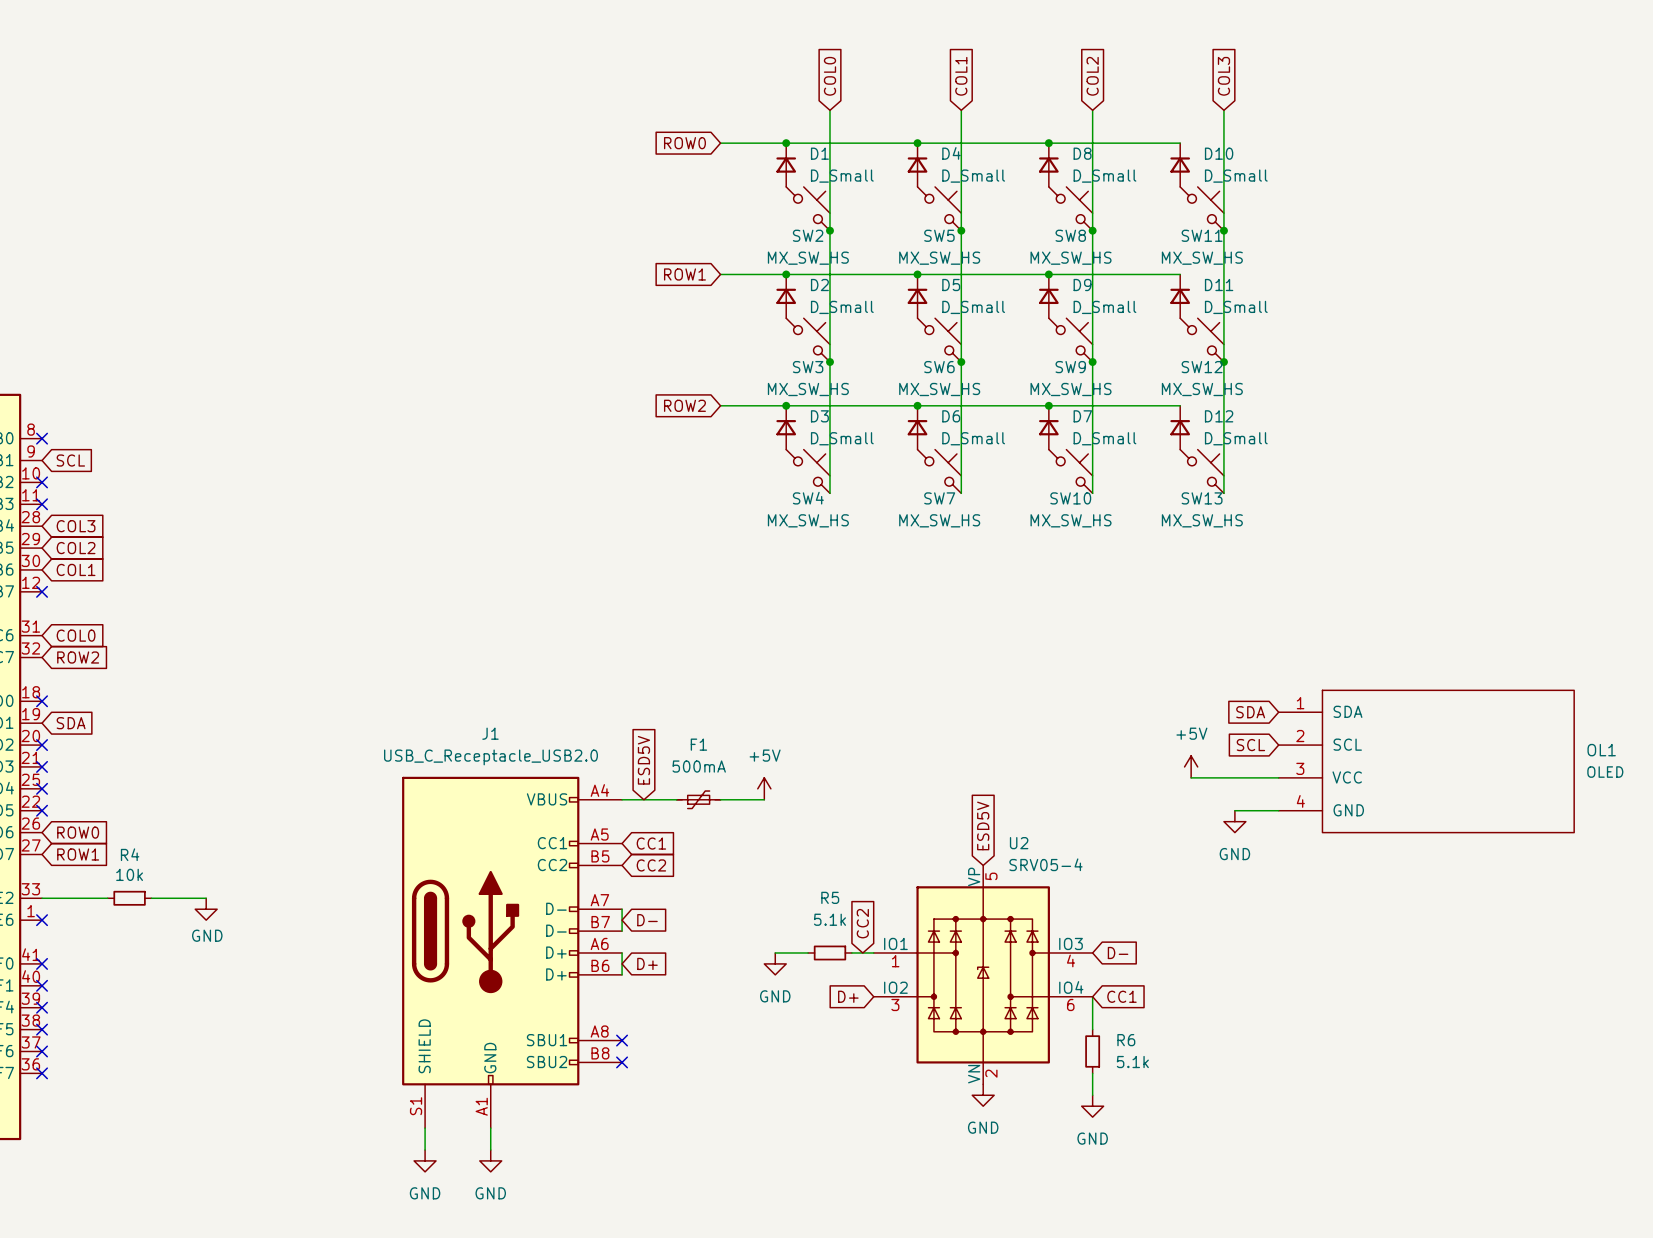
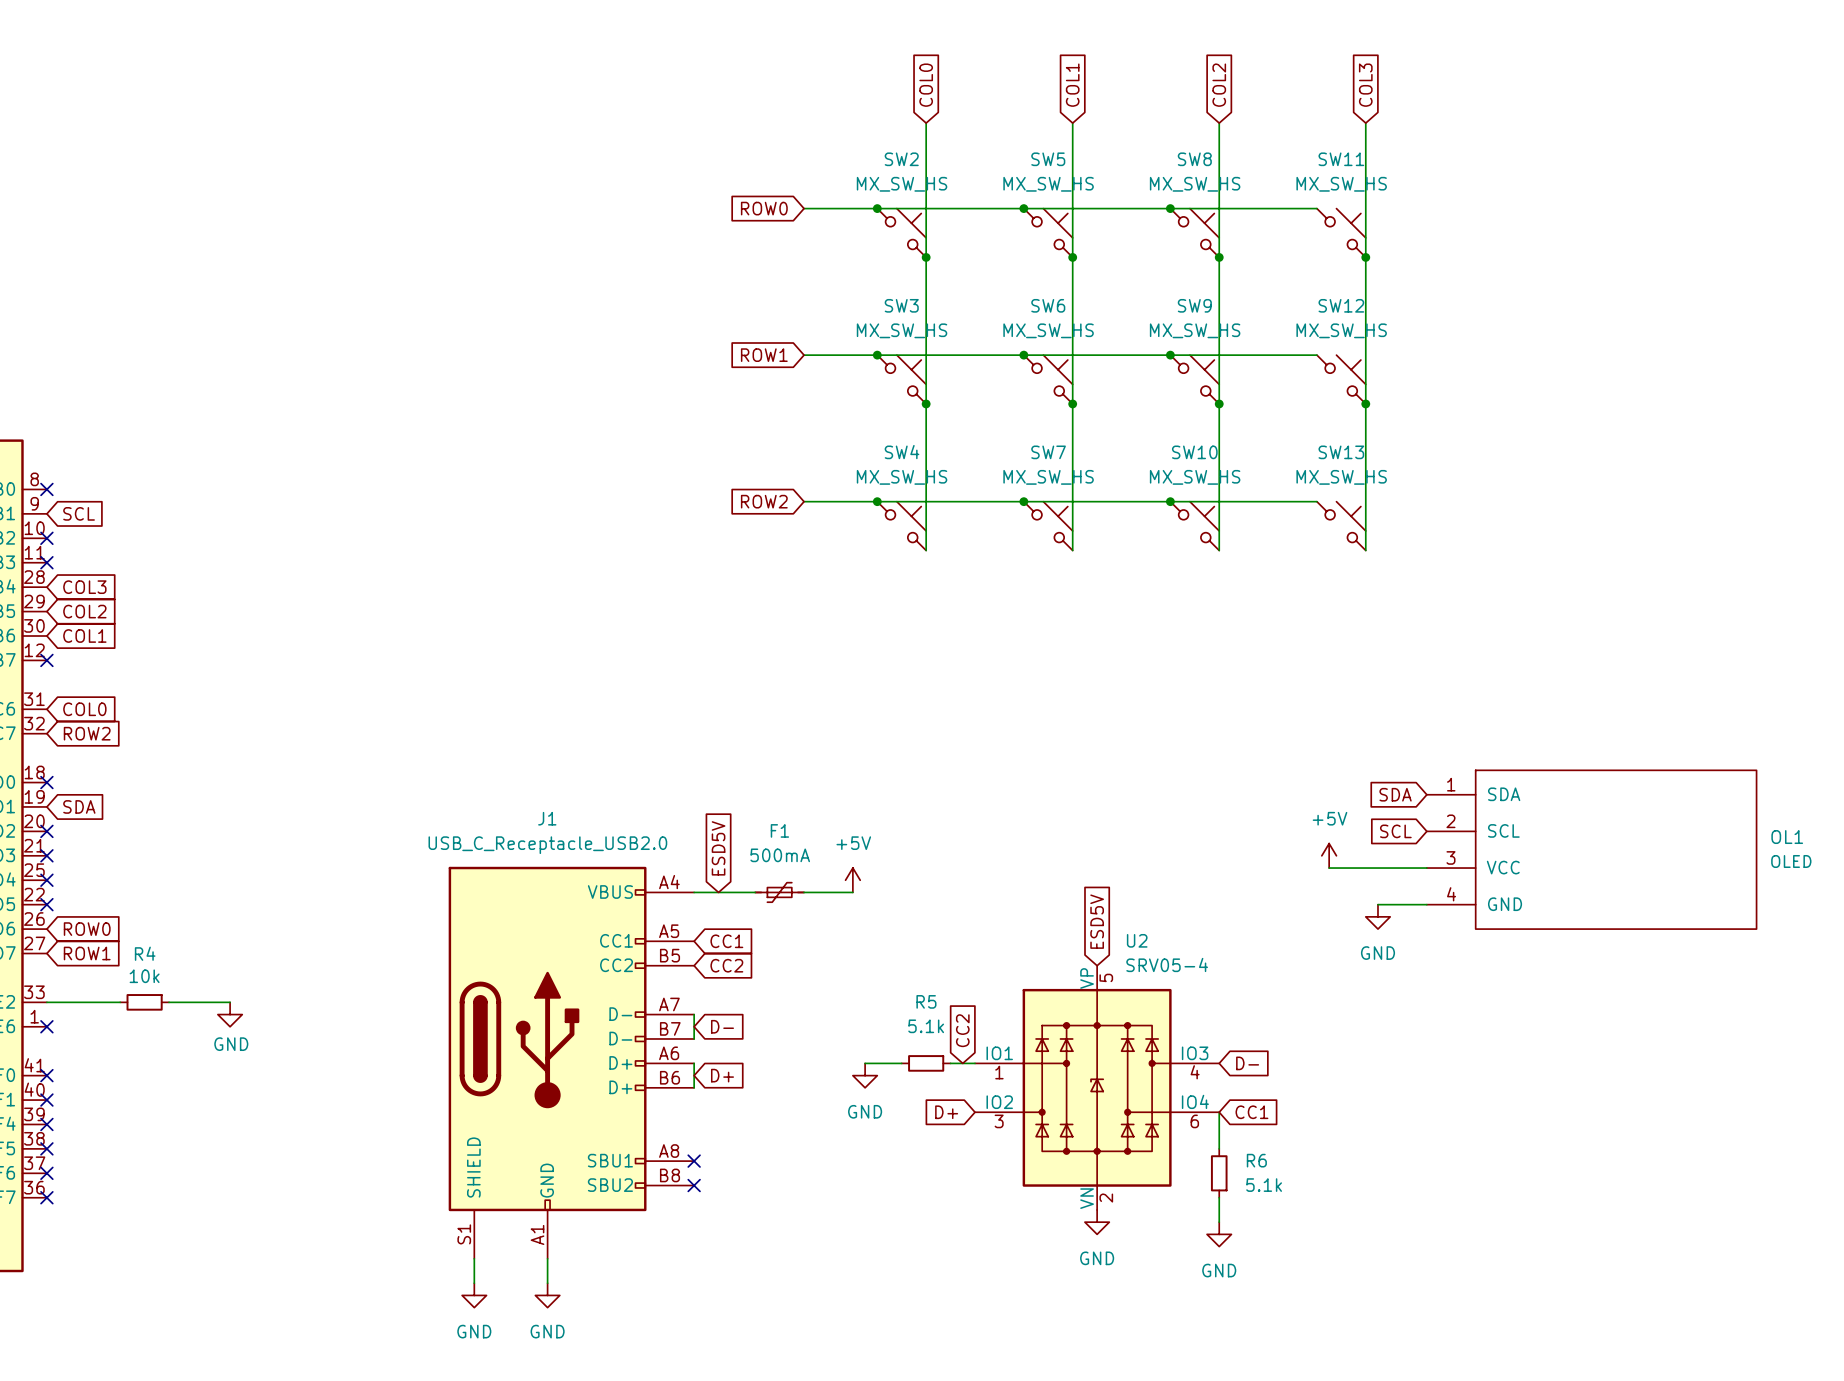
global label position: ROW0 (684, 143) -> ROW0 (764, 208)
wire: (720, 143) (1180, 143) -> (804, 208) (1316, 208)
junction: (786, 143) -> none
junction: (917, 143) -> none
junction: (1048, 143) -> none
D1: D_Small (786, 165) -> none
D4: D_Small (917, 165) -> none
D8: D_Small (1048, 165) -> none
D10: D_Small (1180, 165) -> none
junction: none -> (877, 208)
junction: none -> (1023, 208)
junction: none -> (1170, 208)
SW2 name position: SW2 (808, 235) -> SW2 (901, 159)
SW5 name position: SW5 (939, 235) -> SW5 (1048, 159)
SW8 name position: SW8 (1070, 235) -> SW8 (1194, 159)
SW11 name position: SW11 (1202, 235) -> SW11 (1341, 159)
SW2 value position: MX_SW_HS (808, 258) -> MX_SW_HS (902, 184)
SW5 value position: MX_SW_HS (939, 258) -> MX_SW_HS (1048, 184)
SW8 value position: MX_SW_HS (1071, 258) -> MX_SW_HS (1195, 184)
SW11 value position: MX_SW_HS (1202, 258) -> MX_SW_HS (1341, 184)
global label position: ROW1 (684, 274) -> ROW1 (764, 355)
wire: (720, 274) (1180, 274) -> (804, 355) (1316, 355)
junction: (786, 274) -> none
junction: (917, 274) -> none
junction: (1048, 274) -> none
D2: D_Small (786, 296) -> none
D5: D_Small (917, 296) -> none
D9: D_Small (1048, 296) -> none
D11: D_Small (1180, 296) -> none
junction: none -> (877, 355)
junction: none -> (1023, 355)
junction: none -> (1170, 355)
SW3 name position: SW3 (808, 367) -> SW3 (901, 305)
SW6 name position: SW6 (939, 367) -> SW6 (1048, 305)
SW9 name position: SW9 (1070, 367) -> SW9 (1194, 305)
SW12 name position: SW12 (1202, 367) -> SW12 (1341, 305)
SW3 value position: MX_SW_HS (808, 389) -> MX_SW_HS (902, 330)
SW6 value position: MX_SW_HS (939, 389) -> MX_SW_HS (1048, 330)
SW9 value position: MX_SW_HS (1071, 389) -> MX_SW_HS (1195, 330)
SW12 value position: MX_SW_HS (1202, 389) -> MX_SW_HS (1341, 330)
global label position: ROW2 (684, 405) -> ROW2 (764, 501)
wire: (720, 405) (1180, 405) -> (804, 501) (1316, 501)
junction: (786, 405) -> none
junction: (917, 405) -> none
junction: (1048, 405) -> none
D3: D_Small (786, 427) -> none
D6: D_Small (917, 427) -> none
D7: D_Small (1048, 427) -> none
D12: D_Small (1180, 427) -> none
junction: none -> (877, 501)
junction: none -> (1023, 501)
junction: none -> (1170, 501)
SW4 name position: SW4 (808, 498) -> SW4 (902, 452)
SW7 name position: SW7 (939, 498) -> SW7 (1048, 452)
SW10 name position: SW10 (1070, 498) -> SW10 (1194, 452)
SW13 name position: SW13 (1202, 498) -> SW13 (1341, 452)
SW4 value position: MX_SW_HS (808, 520) -> MX_SW_HS (902, 477)
SW7 value position: MX_SW_HS (939, 520) -> MX_SW_HS (1048, 477)
SW10 value position: MX_SW_HS (1071, 520) -> MX_SW_HS (1195, 477)
SW13 value position: MX_SW_HS (1202, 520) -> MX_SW_HS (1341, 477)

